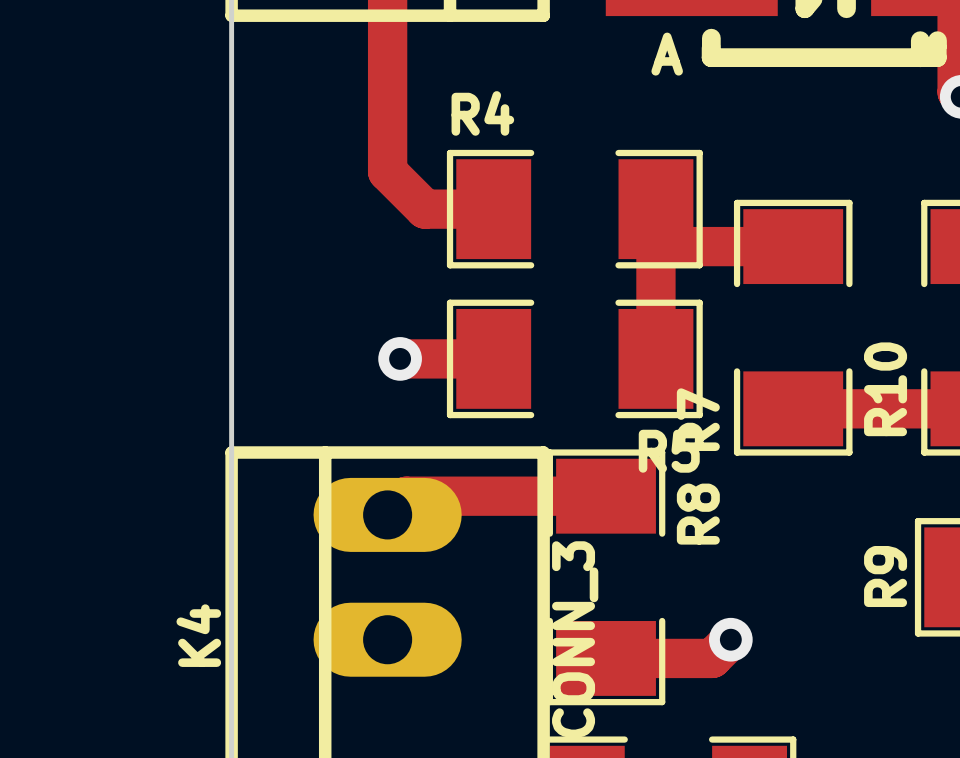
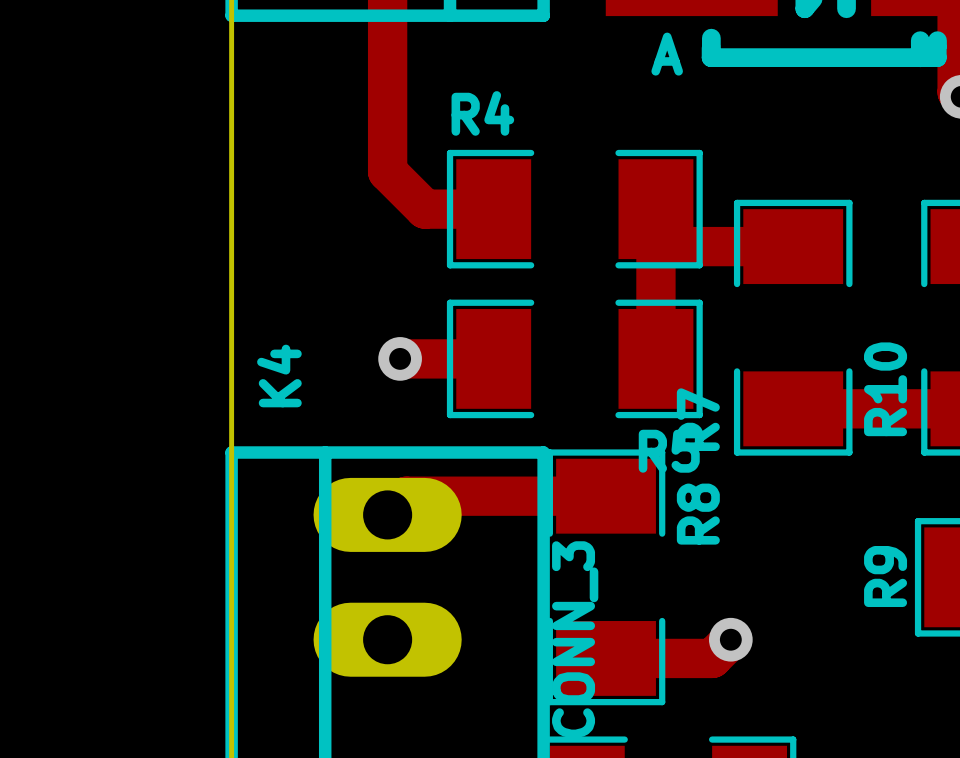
K4 name position: K4 (198, 635) -> K4 (279, 375)

